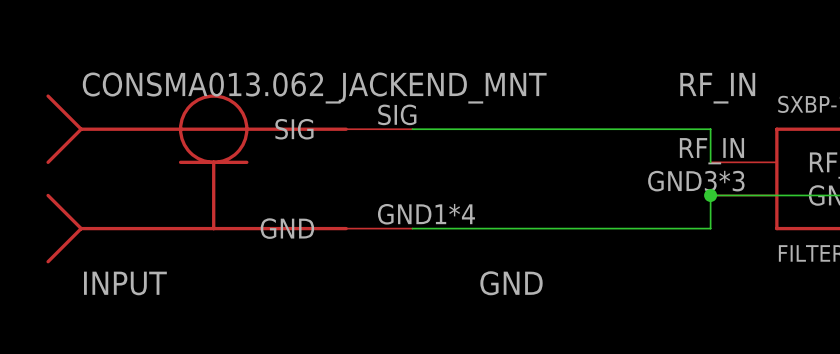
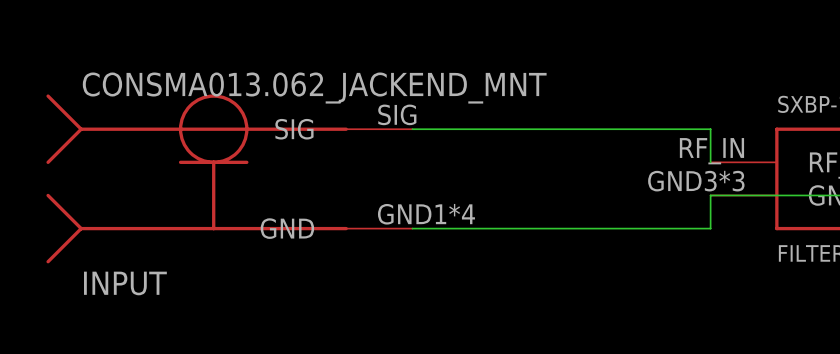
label: RF_IN (717, 88) -> none
junction: (710, 195) -> none
label: GND (511, 283) -> none

